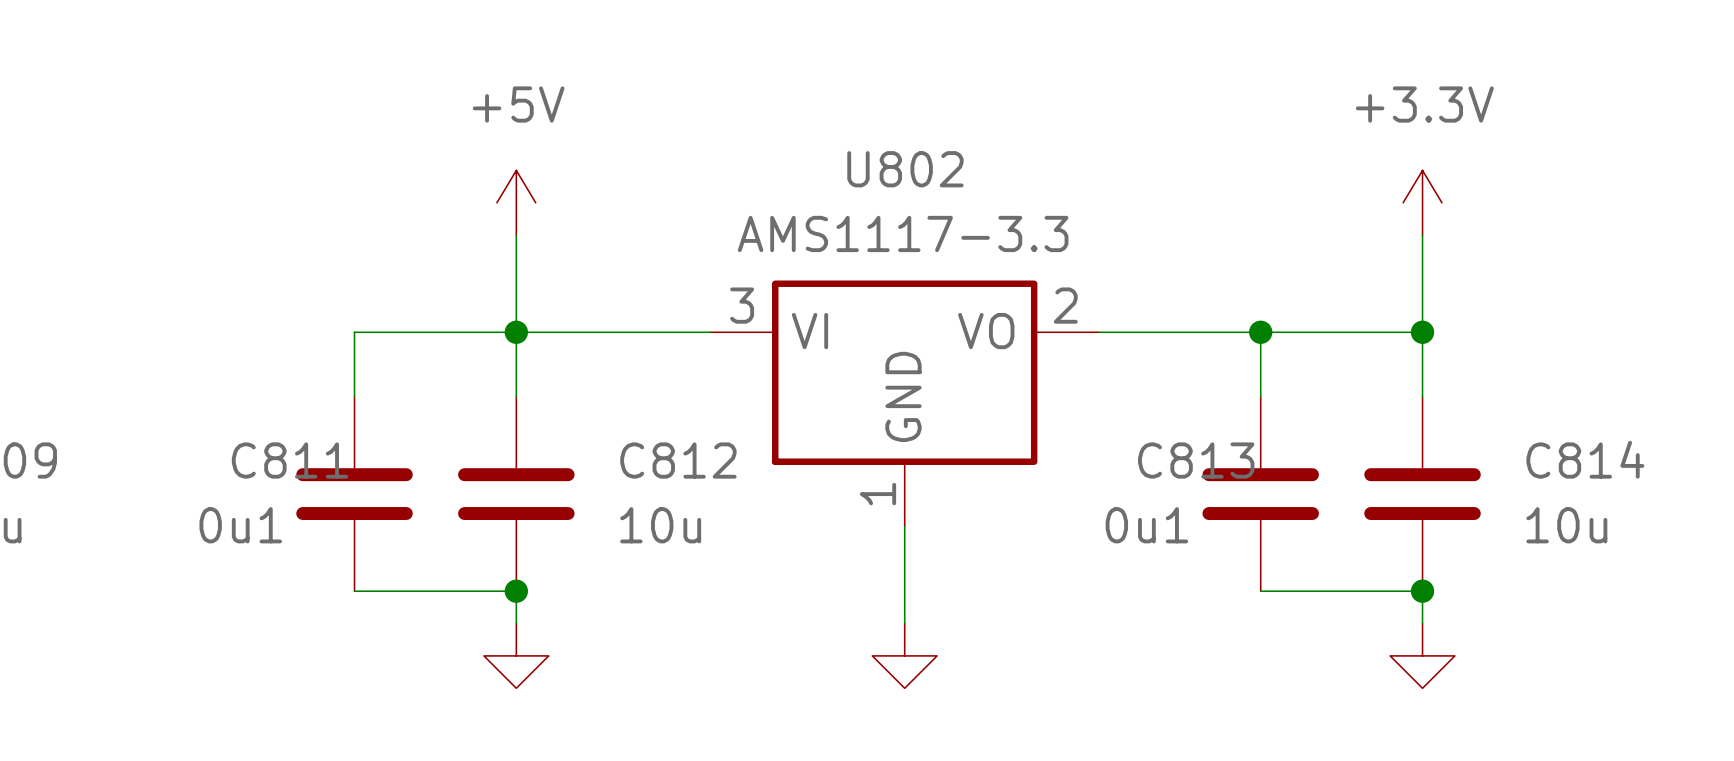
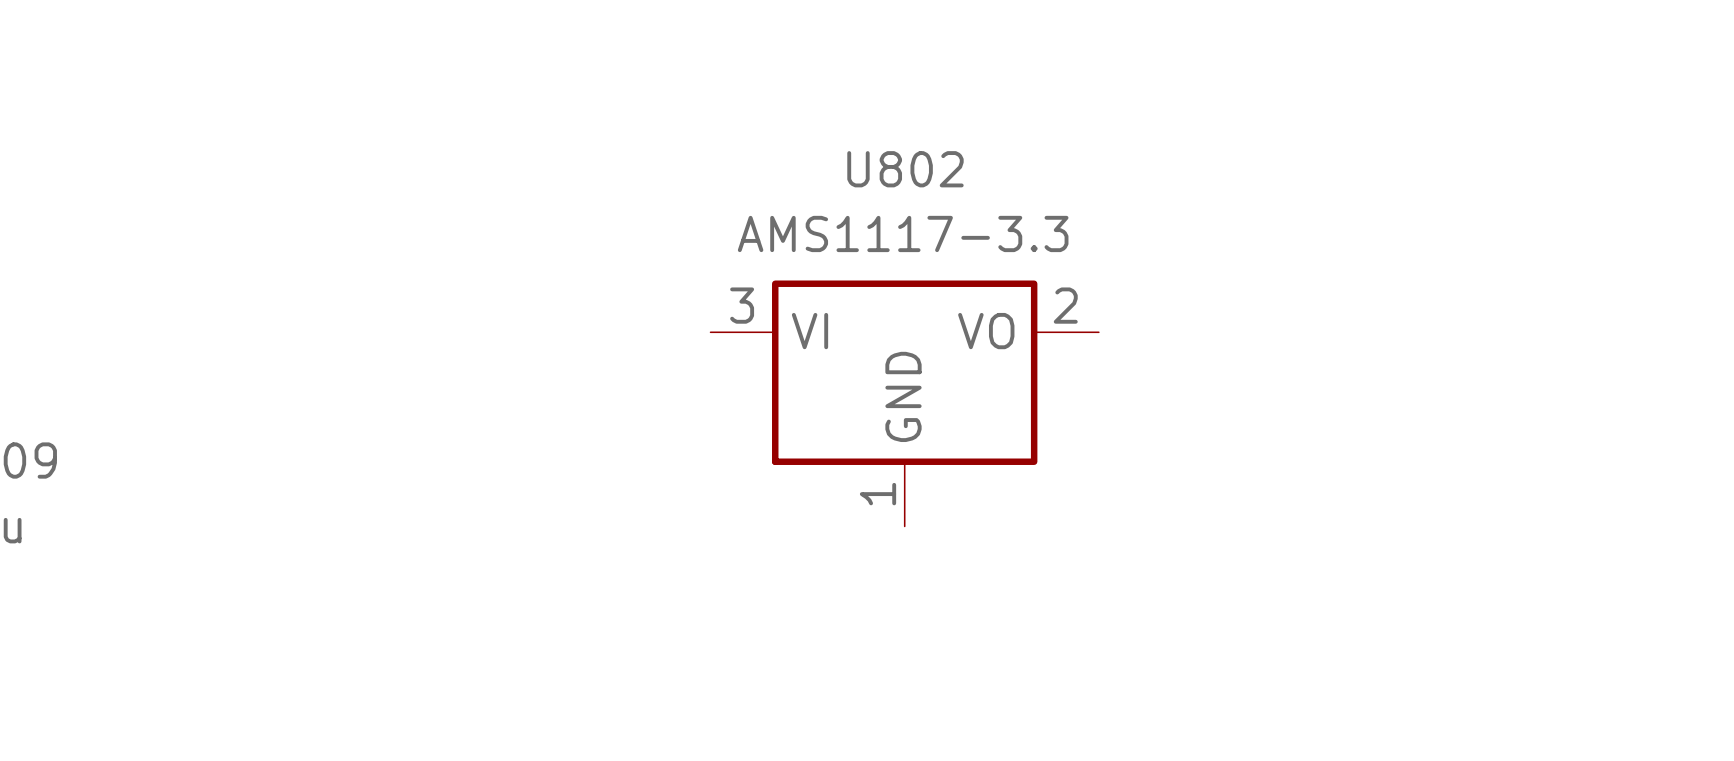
power symbol: +5V (516, 202) -> none
power symbol: +3.3V (1422, 202) -> none
wire: (516, 235) (516, 397) -> none
wire: (1422, 235) (1422, 397) -> none
junction: (516, 332) -> none
wire: (710, 332) (354, 332) (354, 397) -> none
wire: (1098, 332) (1422, 332) -> none
wire: (1260, 332) (1260, 397) -> none
junction: (1260, 332) -> none
junction: (1422, 332) -> none
C811: 0u1 (354, 494) -> none
C812: 10u (516, 494) -> none
C813: 0u1 (1260, 494) -> none
C814: 10u (1422, 494) -> none
wire: (904, 526) (904, 623) -> none
wire: (354, 591) (516, 591) (516, 623) -> none
junction: (516, 591) -> none
wire: (1260, 591) (1422, 591) (1422, 623) -> none
junction: (1422, 591) -> none
power symbol: (516, 655) -> none
power symbol: (904, 655) -> none
power symbol: (1422, 655) -> none

